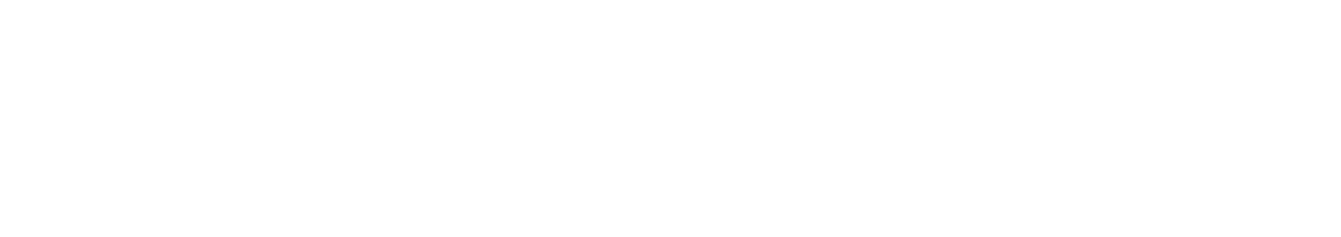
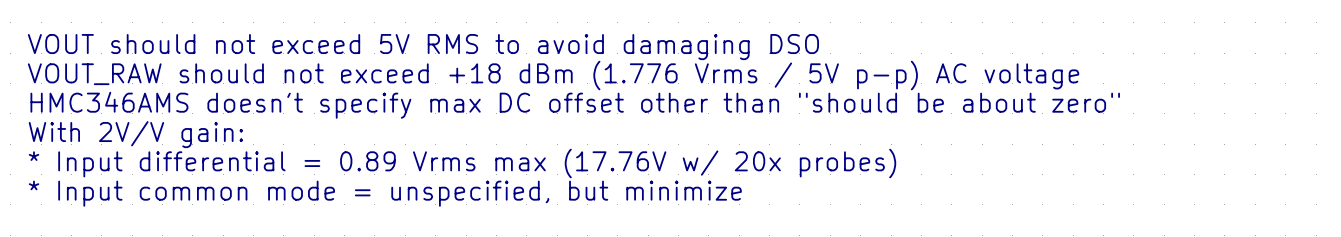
text: none -> VOUT should not exceed 5V RMS to avoid damaging DSO (423, 47)
text: none -> VOUT_RAW should not exceed +18 dBm (1.776 Vrms / 5V p-p) AC voltage (553, 75)
text: none -> HMC346AMS doesn't specify max DC offset other than "should be about zero" (575, 105)
text: none -> With 2V/V gain: (135, 134)
text: none -> * Input differential = 0.89 Vrms max (17.76V w/ 20x probes) (462, 163)
text: none -> * Input common mode = unspecified, but minimize (385, 193)

